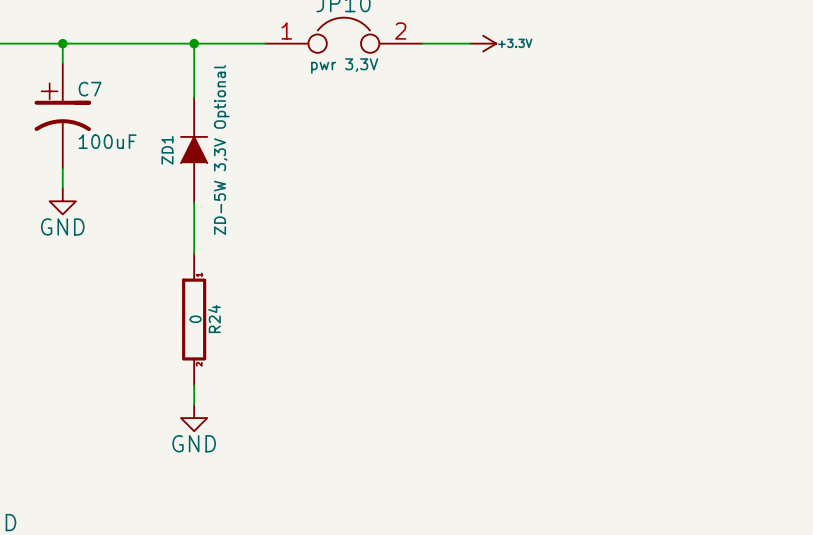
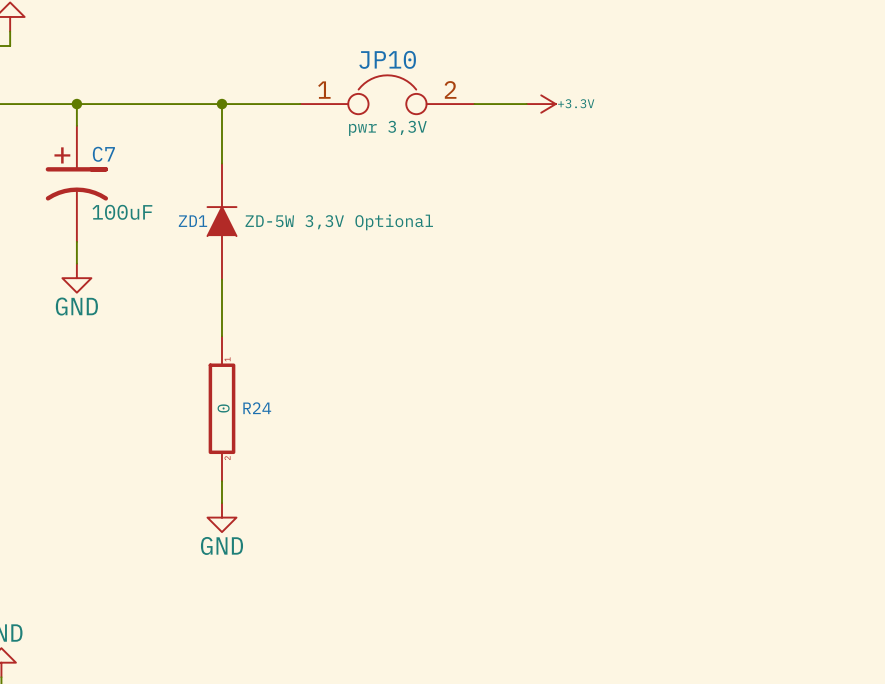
ZD1 name rotation: 0° (167, 150) -> 90° clockwise (192, 221)
ZD1 value rotation: 0° (221, 150) -> 90° clockwise (339, 222)
R24 name rotation: 0° (214, 319) -> 90° clockwise (257, 408)

